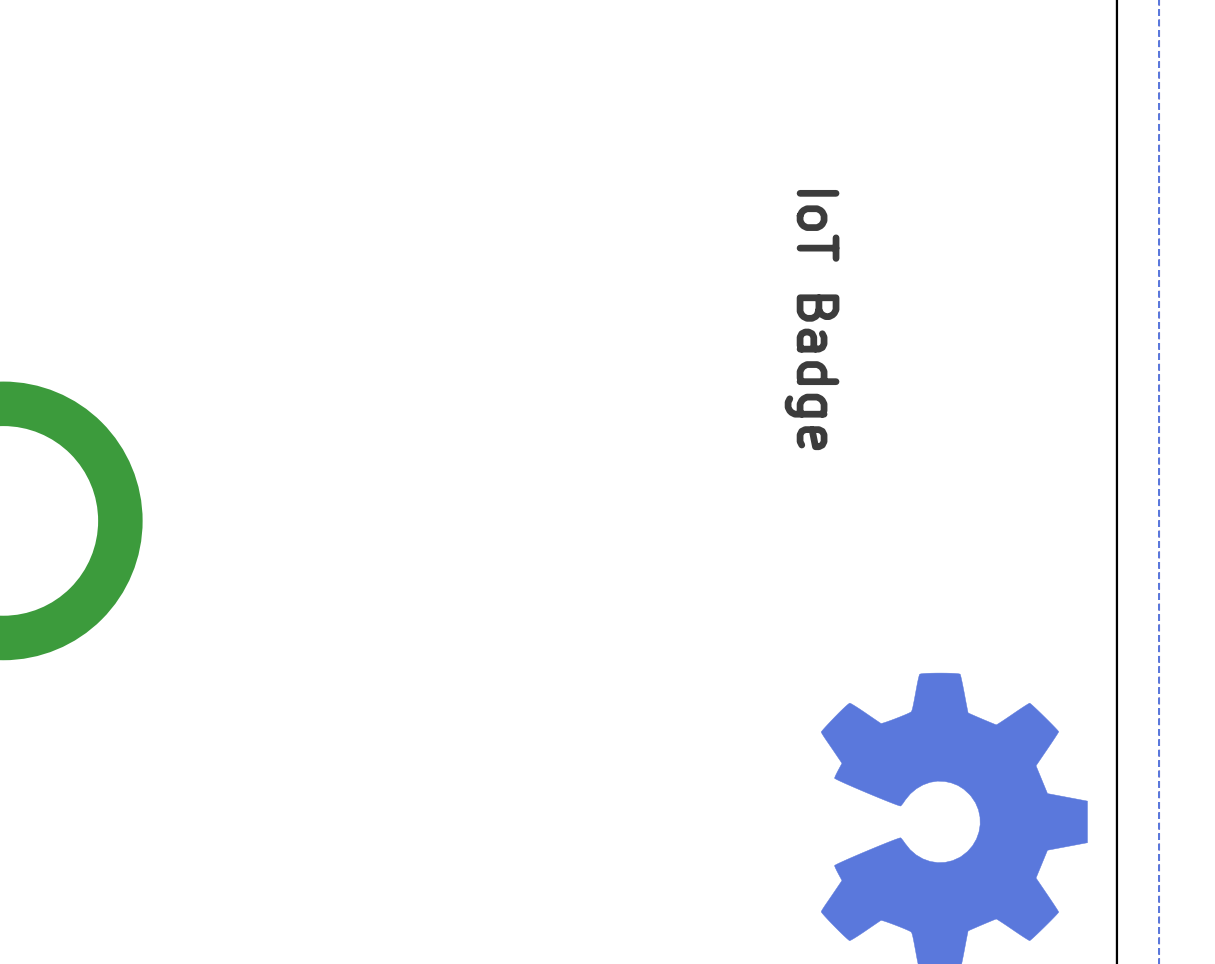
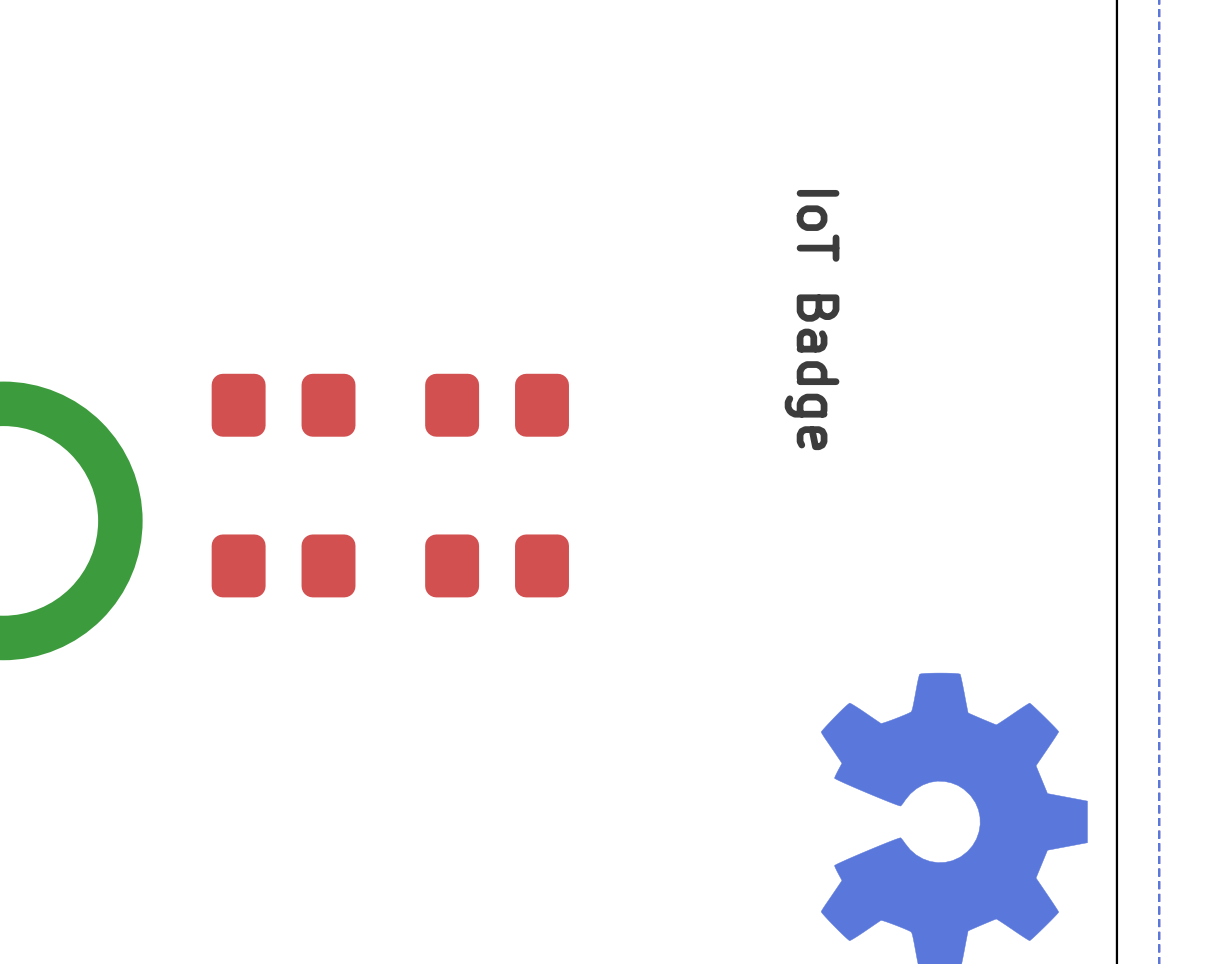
part: none -> (283, 405)
part: none -> (497, 405)
part: none -> (283, 565)
part: none -> (497, 565)

